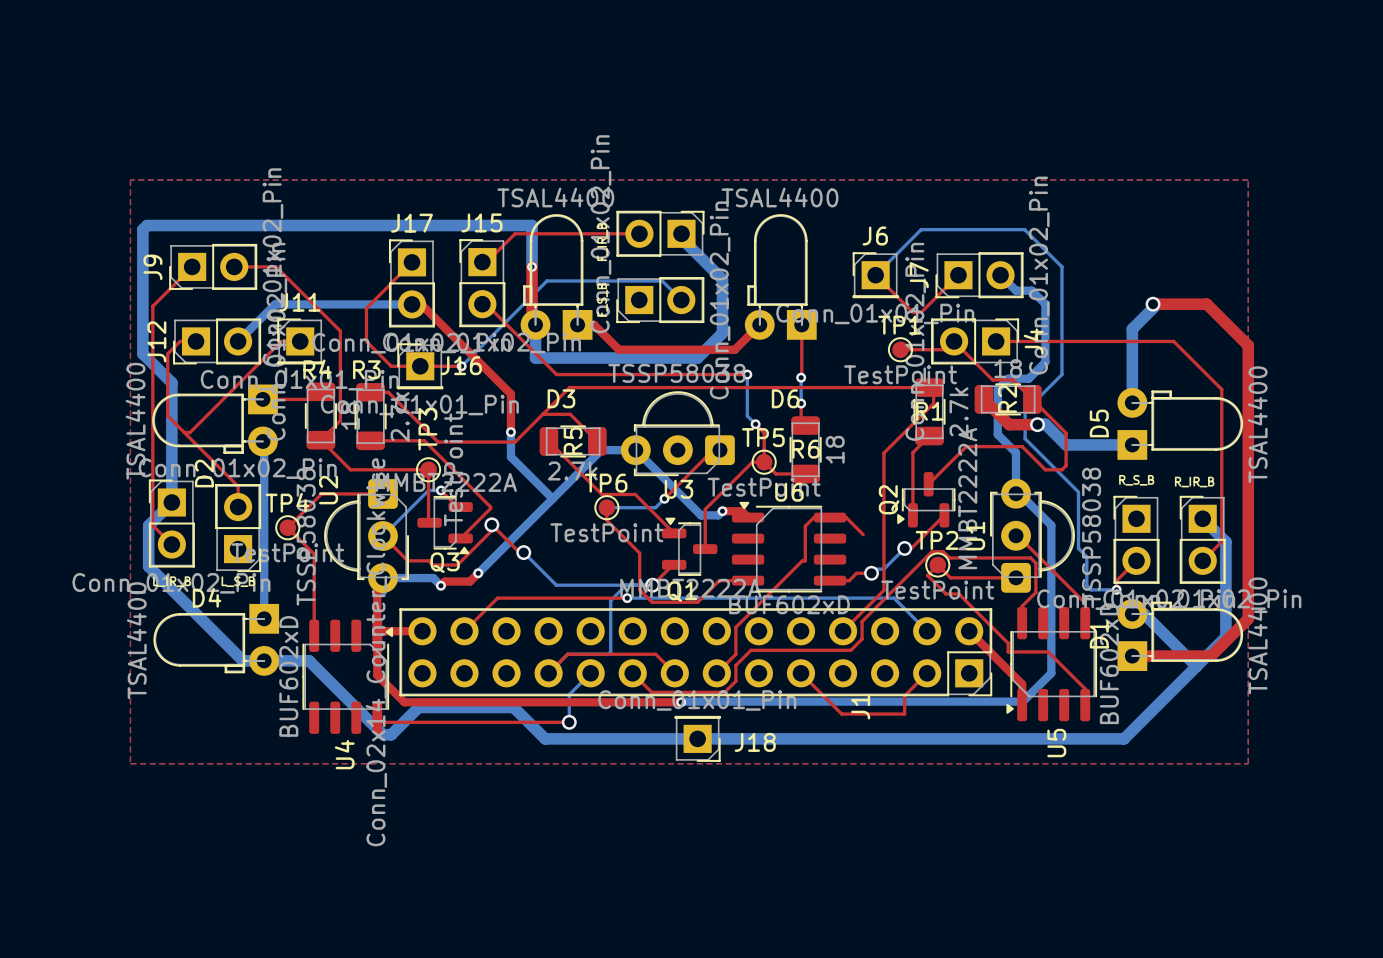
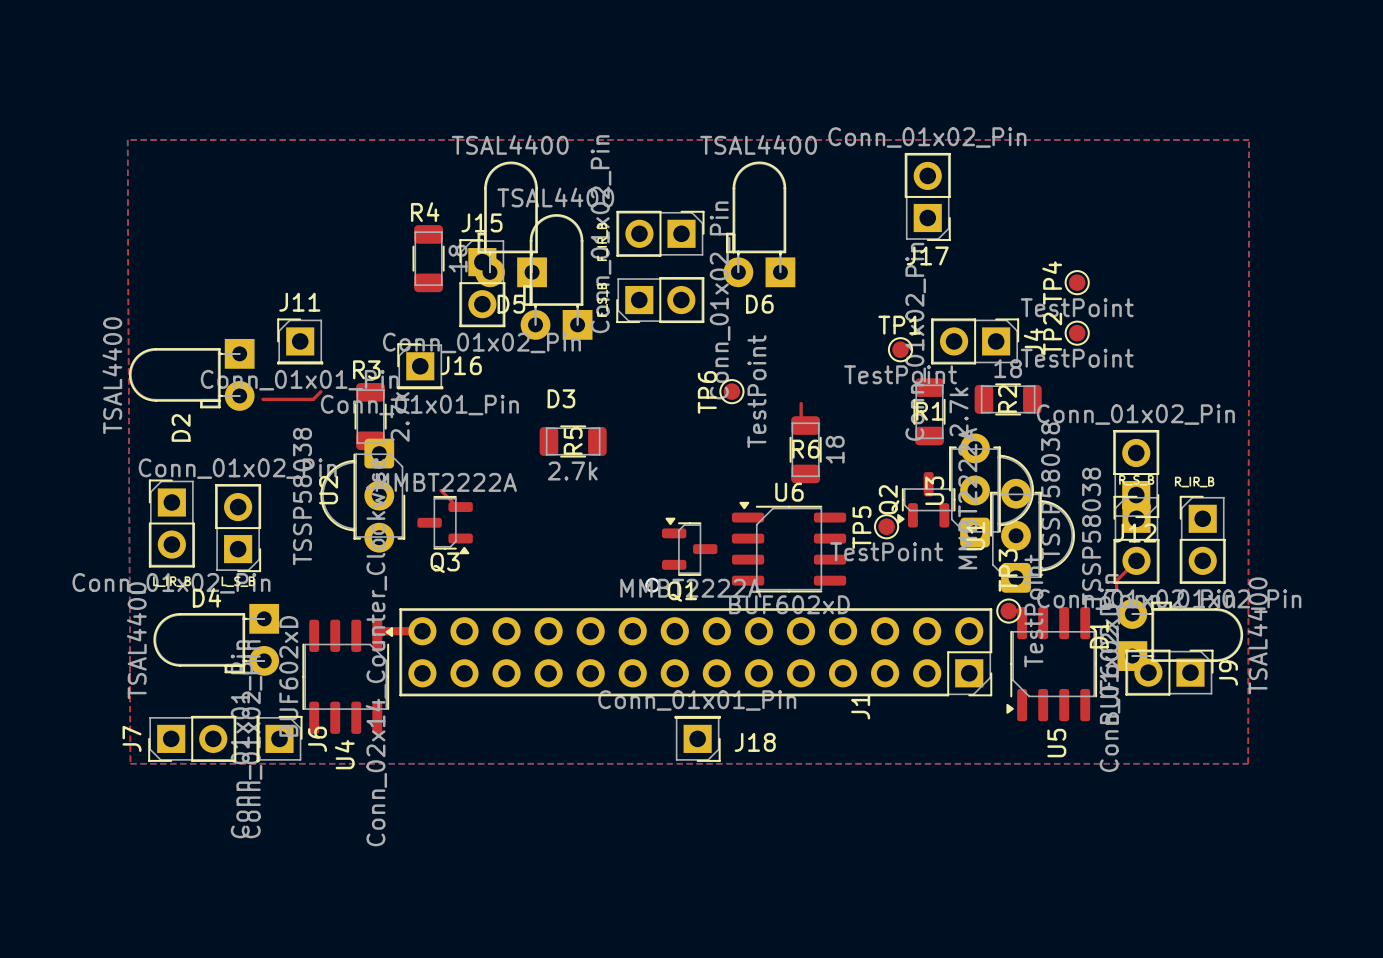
top track: (639, 233) (515, 233) (486, 262) -> none
bottom track: (681, 233) (681, 238) (722, 279) (722, 333) (697, 358) (535, 358) (535, 324) -> none
top track: (411, 262) (366, 308) (366, 341) (391, 366) (461, 366) -> none
top track: (192, 266) (152, 306) (152, 525) (171, 544) -> none
J9 rotation: 0° (213, 266) -> 180° (1169, 672)
J9 position: (213, 266) -> (1169, 672)
top track: (234, 266) (276, 266) (340, 331) (340, 420) (320, 440) (350, 469) (428, 469) (429, 522) -> none
top track: (532, 266) (532, 321) (535, 324) -> none
bottom track: (532, 266) (532, 225) (147, 225) (142, 229) (142, 353) (171, 382) (171, 502) (148, 525) (148, 566) (243, 660) (309, 660) (383, 734) (391, 734) (418, 707) (513, 707) (545, 738) (1124, 738) (1225, 637) (1225, 541) (1202, 518) -> none
via: (532, 266) -> none
top track: (875, 275) (912, 312) (921, 312) (958, 275) -> none
bottom track: (875, 275) (921, 229) (1024, 229) (1061, 266) (1061, 374) (1025, 411) (1025, 438) (1078, 492) (1078, 548) (1086, 556) (1086, 585) (1090, 589) (1116, 589) -> none
J6 rotation: 0° (875, 275) -> 90° clockwise (279, 738)
J6 position: (875, 275) -> (279, 738)
J7 position: (979, 275) -> (192, 738)
bottom track: (1000, 275) (1016, 290) (1031, 290) (1045, 304) (1045, 362) (1028, 378) (1008, 378) (997, 389) (997, 434) (1016, 452) (1016, 493) (1019, 493) (1051, 525) (1051, 673) (1022, 701) (681, 701) -> none
D6 position: (780, 276) -> (759, 224)
J17 rotation: 0° (411, 283) -> 180° (927, 196)
J17 position: (411, 283) -> (927, 196)
bottom track: (681, 300) (662, 281) (546, 281) (461, 366) -> none
top track: (411, 304) (421, 304) (510, 394) (510, 432) -> none
bottom track: (411, 304) (275, 304) (238, 341) -> none
top track: (486, 304) (556, 374) (747, 374) -> none
top track: (1153, 304) (1206, 304) (1248, 345) (1248, 618) (1211, 656) (1132, 656) -> none
bottom track: (1153, 304) (1157, 304) (1132, 329) (1132, 402) -> none
via: (1153, 304) -> none
top track: (577, 324) (594, 324) (618, 349) (734, 349) (759, 324) -> none
top track: (801, 324) (801, 377) -> none
top track: (196, 341) (180, 341) (167, 353) (167, 415) (238, 486) (238, 507) -> none
J12 rotation: 0° (217, 341) -> 90° counterclockwise (1136, 474)
J12 position: (217, 341) -> (1136, 474)
top track: (300, 341) (281, 341) (190, 432) (184, 432) -> none
top track: (996, 341) (1173, 341) (1221, 389) (1221, 541) (1202, 560) -> none
top track: (900, 349) (945, 349) (954, 341) (992, 379) (1012, 379) (1066, 433) (1066, 465) (1061, 469) (1045, 469) (1022, 446) (966, 446) (928, 484) -> none
via: (461, 366) -> none
bottom track: (747, 374) (747, 415) (755, 424) -> none
via: (747, 374) -> none
bottom track: (801, 377) (801, 403) -> none
via: (801, 377) -> none
top track: (370, 392) (388, 392) (438, 442) (515, 442) (569, 387) (929, 387) (933, 391) (933, 403) (917, 420) -> none
D6 name position: D6 (785, 398) -> D6 (759, 304)
top track: (983, 399) (1009, 424) (1037, 424) -> none
via: (801, 403) -> none
top track: (542, 414) (570, 414) (597, 441) -> none
R4 position: (320, 415) -> (428, 258)
D2 position: (215, 420) -> (191, 374)
top track: (916, 420) (883, 453) (883, 590) (843, 631) -> none
D5 rotation: 0° (1180, 423) -> 90° counterclockwise (511, 224)
D5 position: (1180, 423) -> (511, 224)
top track: (755, 424) (764, 432) (764, 462) -> none
via: (755, 424) -> none
bottom track: (1037, 424) (1045, 424) (1066, 444) (1132, 444) -> none
via: (1037, 424) -> none
bottom track: (510, 432) (510, 456) (552, 498) -> none
via: (510, 432) -> none
U3 rotation: 0° (677, 433) -> 90° clockwise (991, 490)
U3 position: (677, 433) -> (991, 490)
top track: (929, 436) (912, 452) (912, 515) -> none
TP5 name rotation: 0° (763, 437) -> 90° counterclockwise (862, 527)
top track: (370, 440) (424, 440) (490, 507) (460, 538) -> none
bottom track: (262, 441) (264, 618) -> none
top track: (548, 441) (601, 494) (635, 494) (674, 533) -> none
top track: (719, 450) (713, 450) (664, 498) -> none
top track: (764, 462) (775, 473) (805, 473) -> none
top track: (764, 462) (752, 462) (705, 509) (705, 549) -> none
TP5 position: (764, 462) -> (886, 526)
TP3 position: (428, 469) -> (1008, 611)
TP6 name rotation: 0° (606, 483) -> 90° counterclockwise (707, 392)
bottom track: (440, 490) (428, 490) (383, 536) -> none
via: (440, 490) -> none
top track: (383, 493) (321, 493) (287, 527) (314, 554) (314, 635) -> none
bottom track: (664, 498) (655, 507) (606, 507) -> none
via: (664, 498) -> none
TP4 name rotation: 0° (287, 502) -> 90° counterclockwise (1052, 283)
top track: (606, 507) (606, 520) (639, 553) (639, 589) (652, 602) (697, 602) (719, 580) (748, 580) -> none
TP6 position: (606, 507) -> (731, 391)
top track: (722, 511) (741, 511) (748, 517) -> none
bottom track: (722, 511) (718, 515) (701, 515) (635, 450) (601, 450) (478, 573) -> none
via: (722, 511) -> none
top track: (944, 515) (911, 548) (904, 548) -> none
via: (491, 524) -> none
TP4 position: (287, 527) -> (1077, 282)
TP6 value rotation: 0° (606, 532) -> 90° counterclockwise (756, 391)
top track: (863, 534) (846, 517) (813, 517) (805, 526) (805, 560) (802, 560) (735, 627) (735, 654) (716, 673) -> none
top track: (1016, 535) (1085, 603) (1085, 623) -> none
U2 position: (366, 536) -> (362, 495)
top track: (383, 536) (407, 560) (428, 560) (432, 565) (457, 565) (491, 530) (491, 524) (519, 552) (523, 552) -> none
TP2 name rotation: 0° (936, 540) -> 90° counterclockwise (1052, 333)
bottom track: (904, 548) (883, 569) (875, 569) (871, 573) -> none
via: (904, 548) -> none
bottom track: (523, 552) (556, 585) (652, 585) -> none
via: (523, 552) -> none
top track: (674, 564) (652, 585) -> none
TP2 position: (937, 565) -> (1077, 333)
top track: (478, 573) (469, 581) (445, 581) (440, 585) -> none
via: (478, 573) -> none
top track: (871, 573) (856, 573) (849, 580) (830, 580) -> none
via: (871, 573) -> none
top track: (1016, 577) (950, 577) (937, 565) (927, 575) (946, 593) (958, 593) (1008, 643) (1008, 651) (1048, 651) (1085, 688) (1085, 705) -> none
top track: (383, 578) (377, 583) (377, 675) (404, 702) (681, 702) -> none
bottom track: (440, 585) (433, 578) (383, 578) (383, 591) -> none
via: (440, 585) -> none
bottom track: (626, 585) (610, 600) (610, 651) (608, 654) (567, 654) (548, 673) -> none
via: (1116, 589) -> none
top track: (627, 598) (497, 598) (464, 631) -> none
bottom track: (627, 598) (894, 598) (927, 631) -> none
via: (627, 598) -> none
bottom track: (1124, 614) (1144, 614) (1196, 666) -> none
top track: (1022, 623) (1022, 606) (1035, 592) (1035, 563) (1030, 557) (949, 557) (943, 551) (931, 551) (862, 621) (862, 639) (850, 650) (751, 650) (735, 665) (735, 681) (724, 692) (651, 692) (632, 673) -> none
top track: (969, 631) (1022, 684) (1022, 705) -> none
top track: (548, 673) (567, 654) (655, 654) (674, 673) -> none
bottom track: (590, 673) (569, 694) (569, 722) -> none
top track: (800, 673) (841, 714) (904, 714) (904, 695) (927, 673) -> none
via: (681, 702) -> none
top track: (377, 717) (383, 722) (569, 722) -> none
via: (569, 722) -> none
top zone outline: (130, 763) (130, 179) (1248, 179) (1248, 763) -> (130, 763) (127, 139) (1249, 139) (1248, 763)

